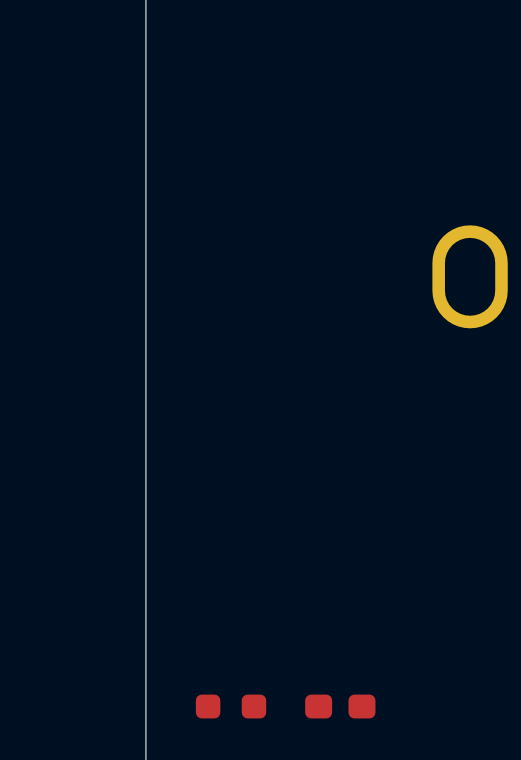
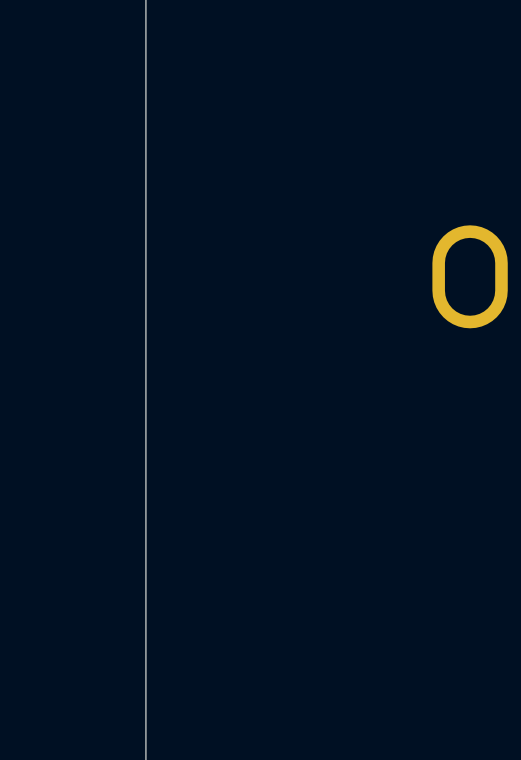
part: (231, 706) -> none
part: (340, 706) -> none

